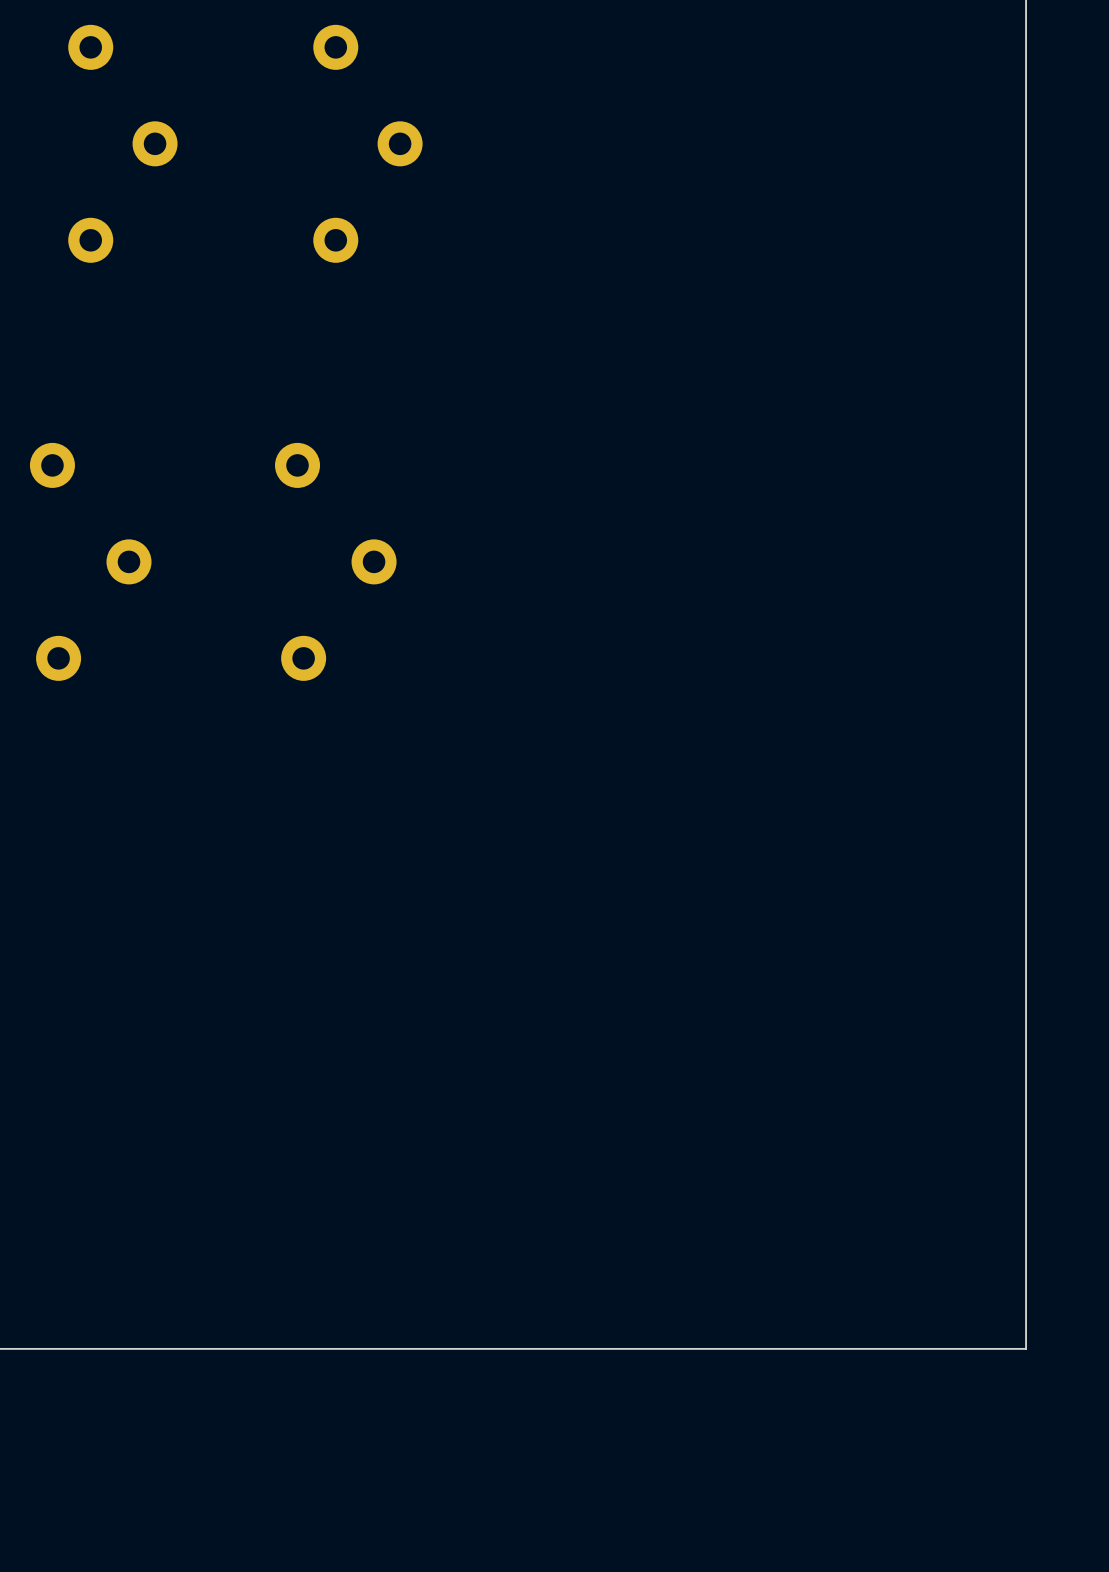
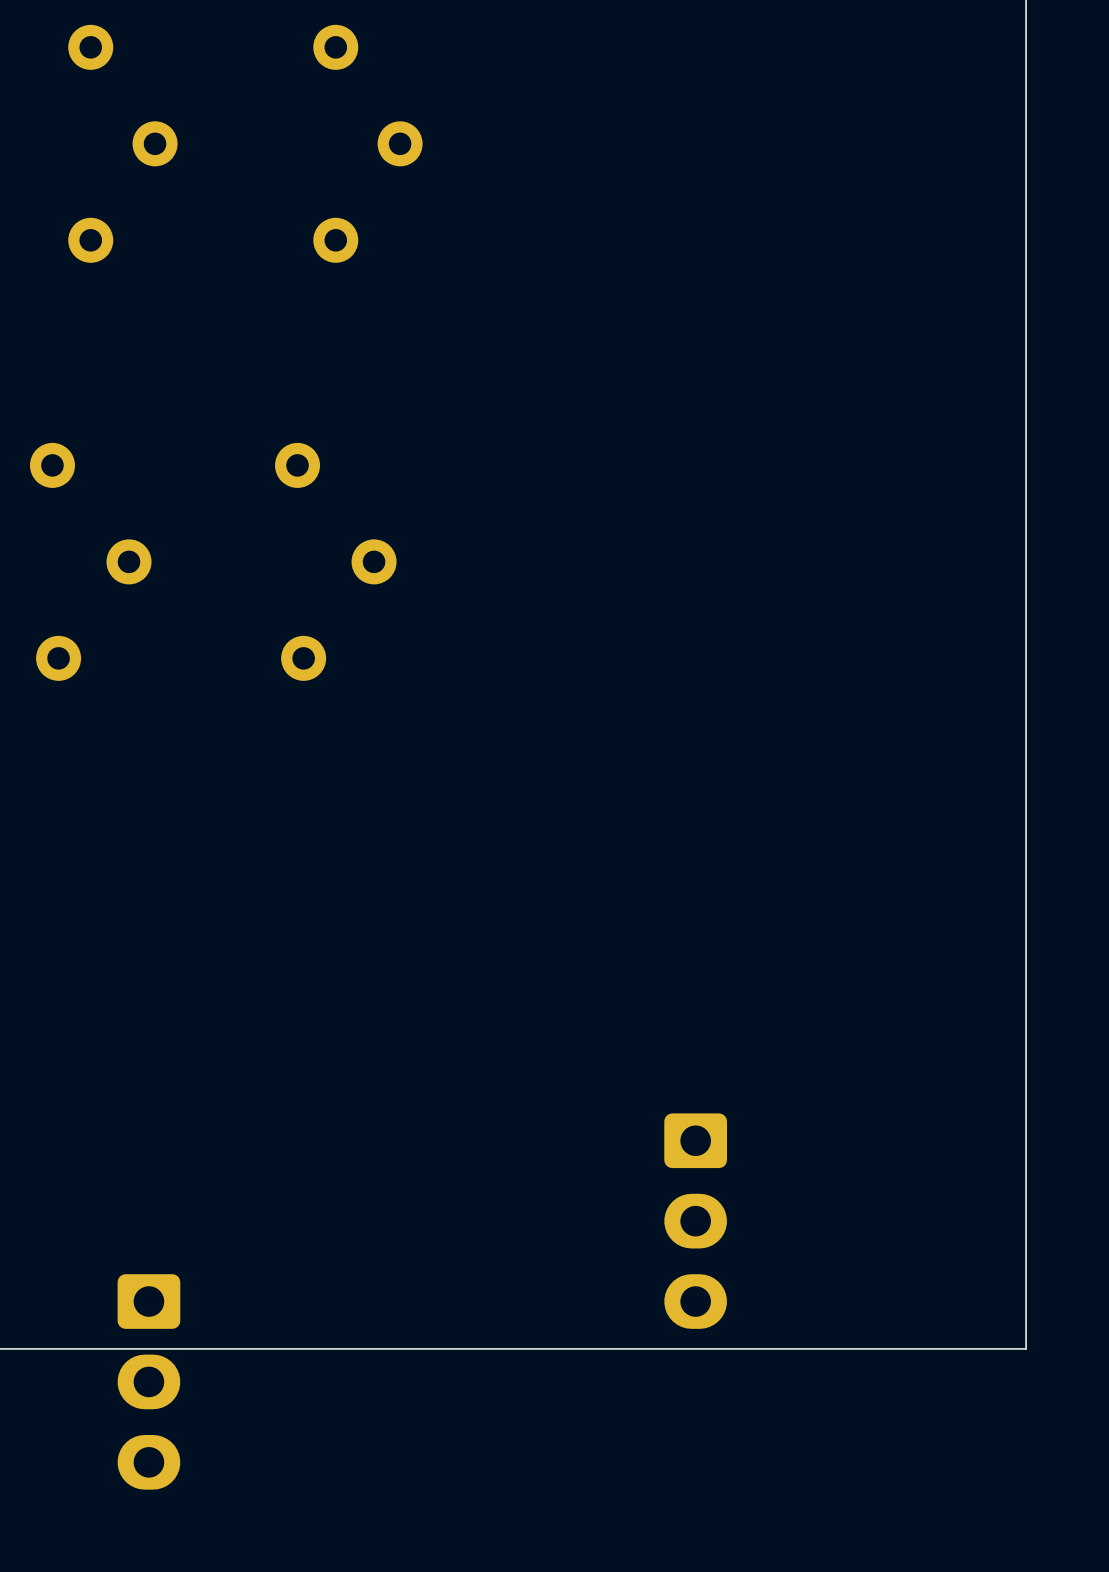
part: none -> (695, 1221)
part: none -> (148, 1381)

